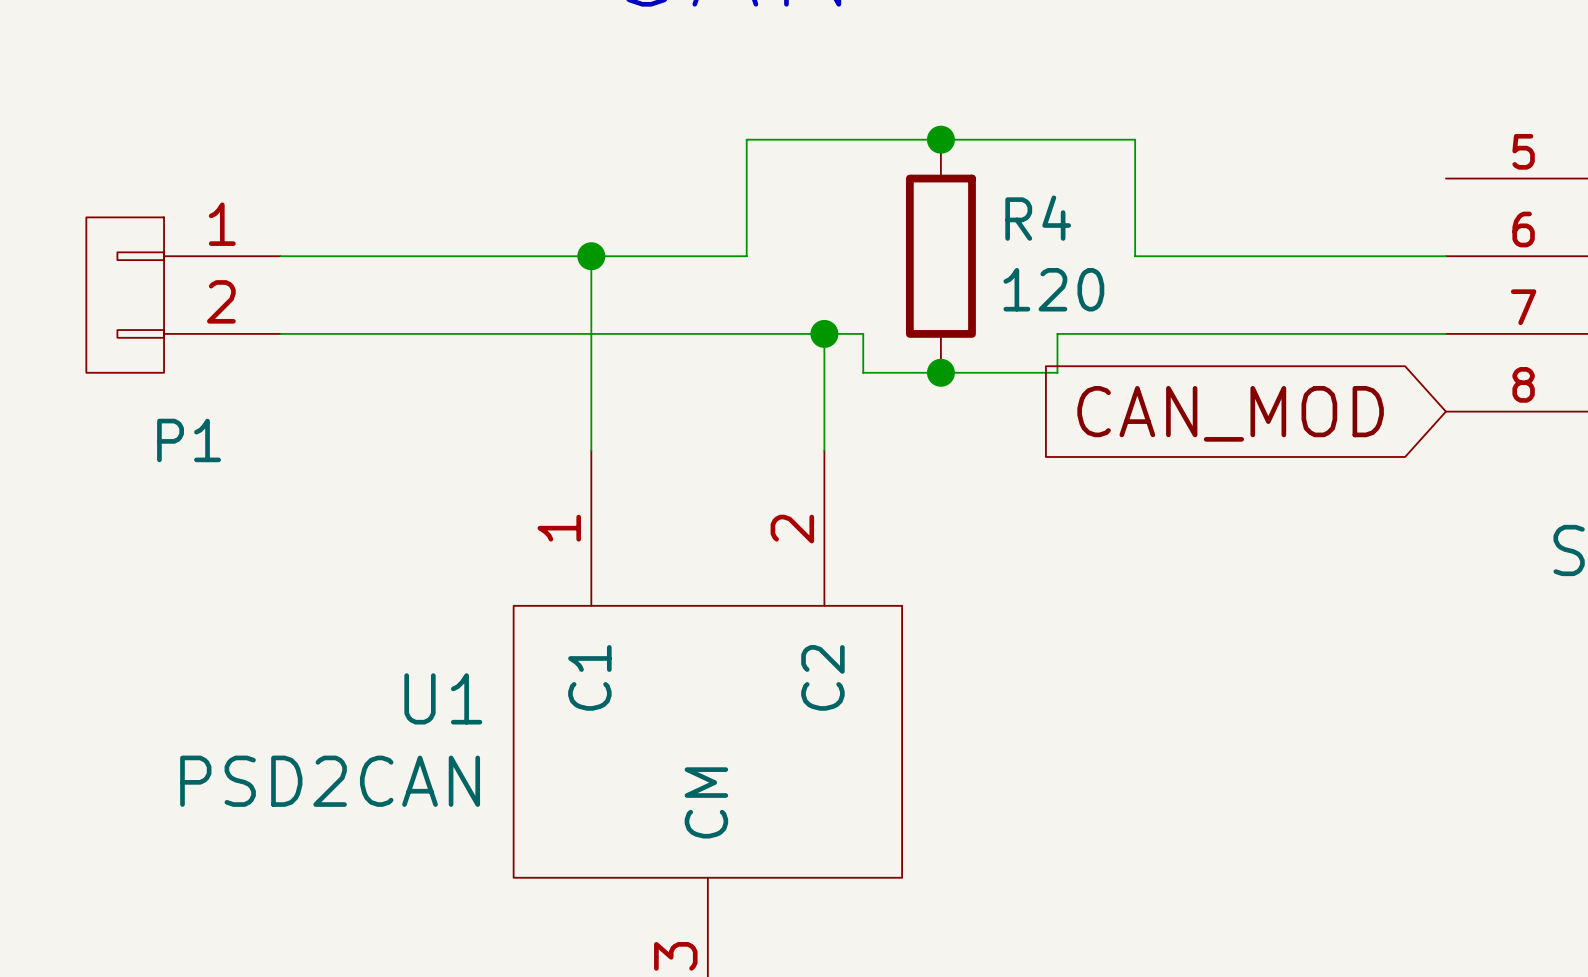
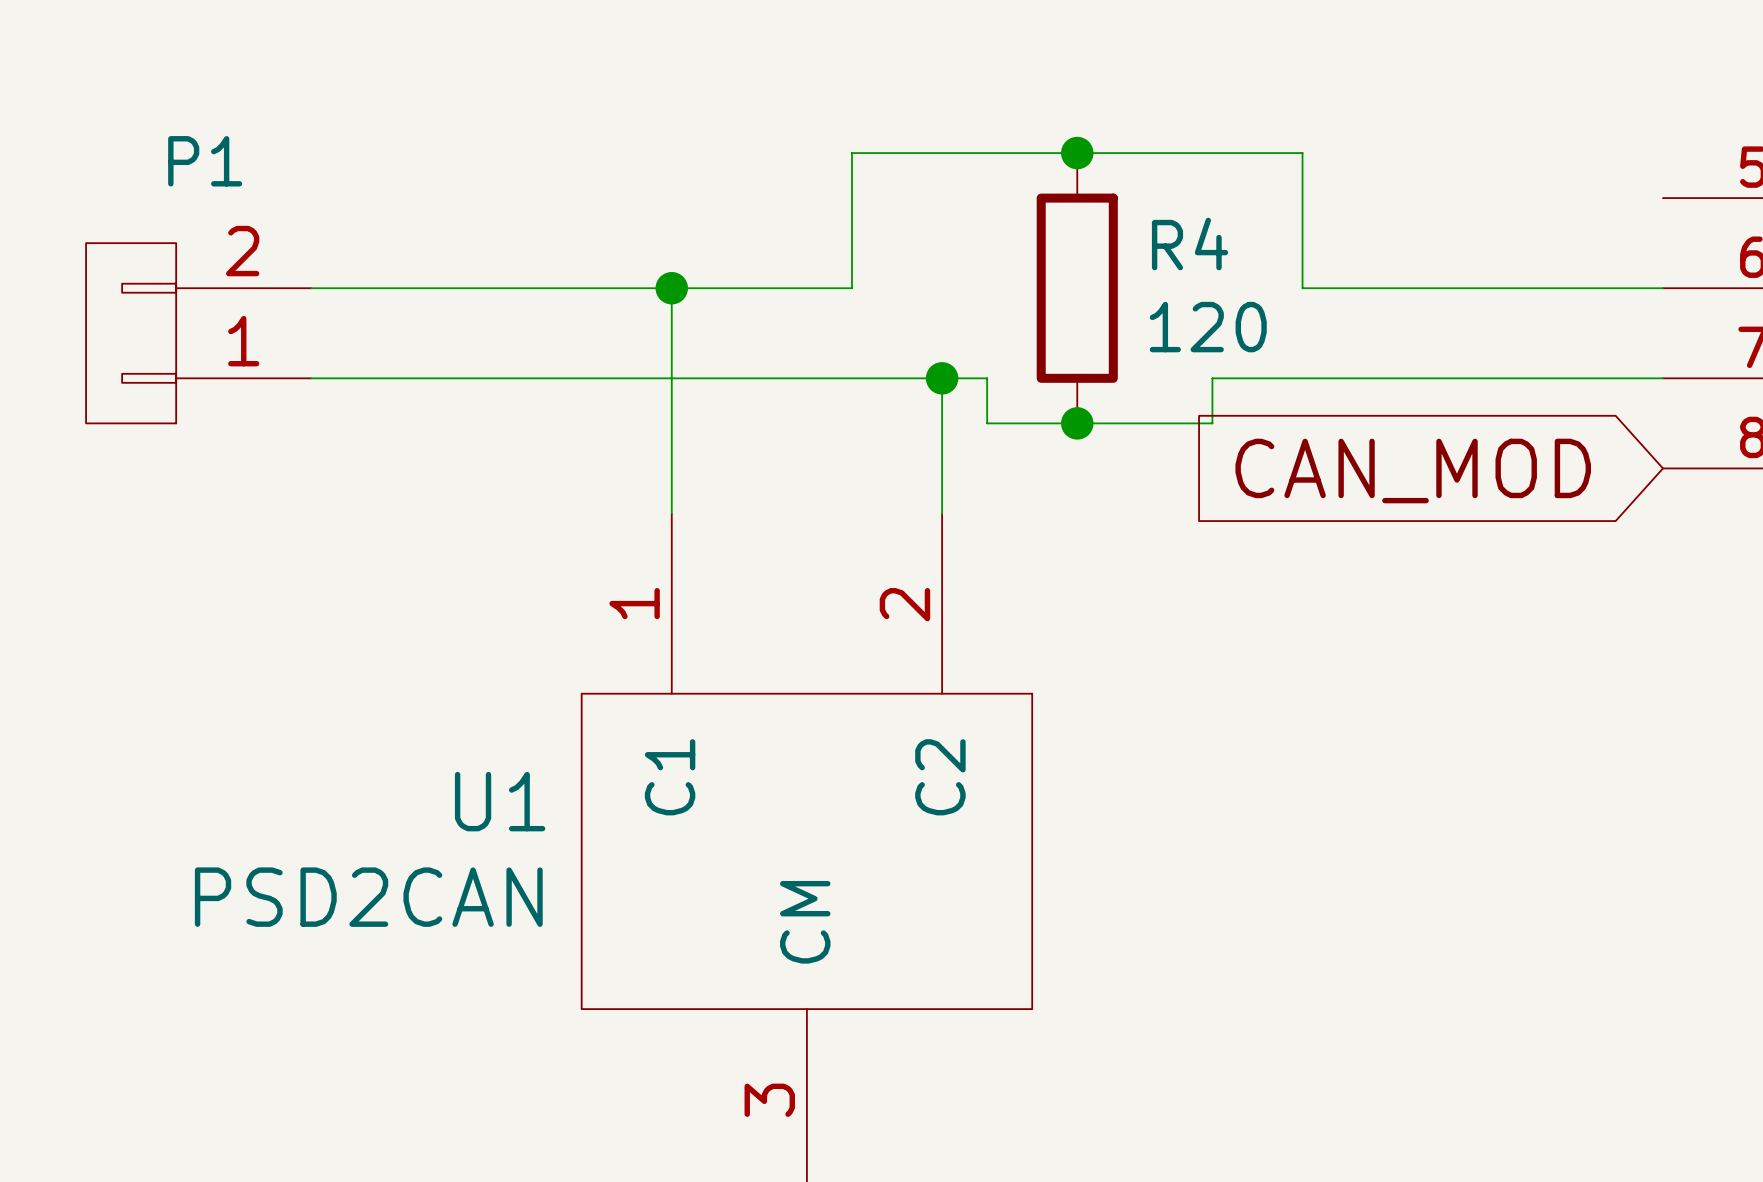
P1 flip: as is (125, 295) -> up-down (131, 333)

